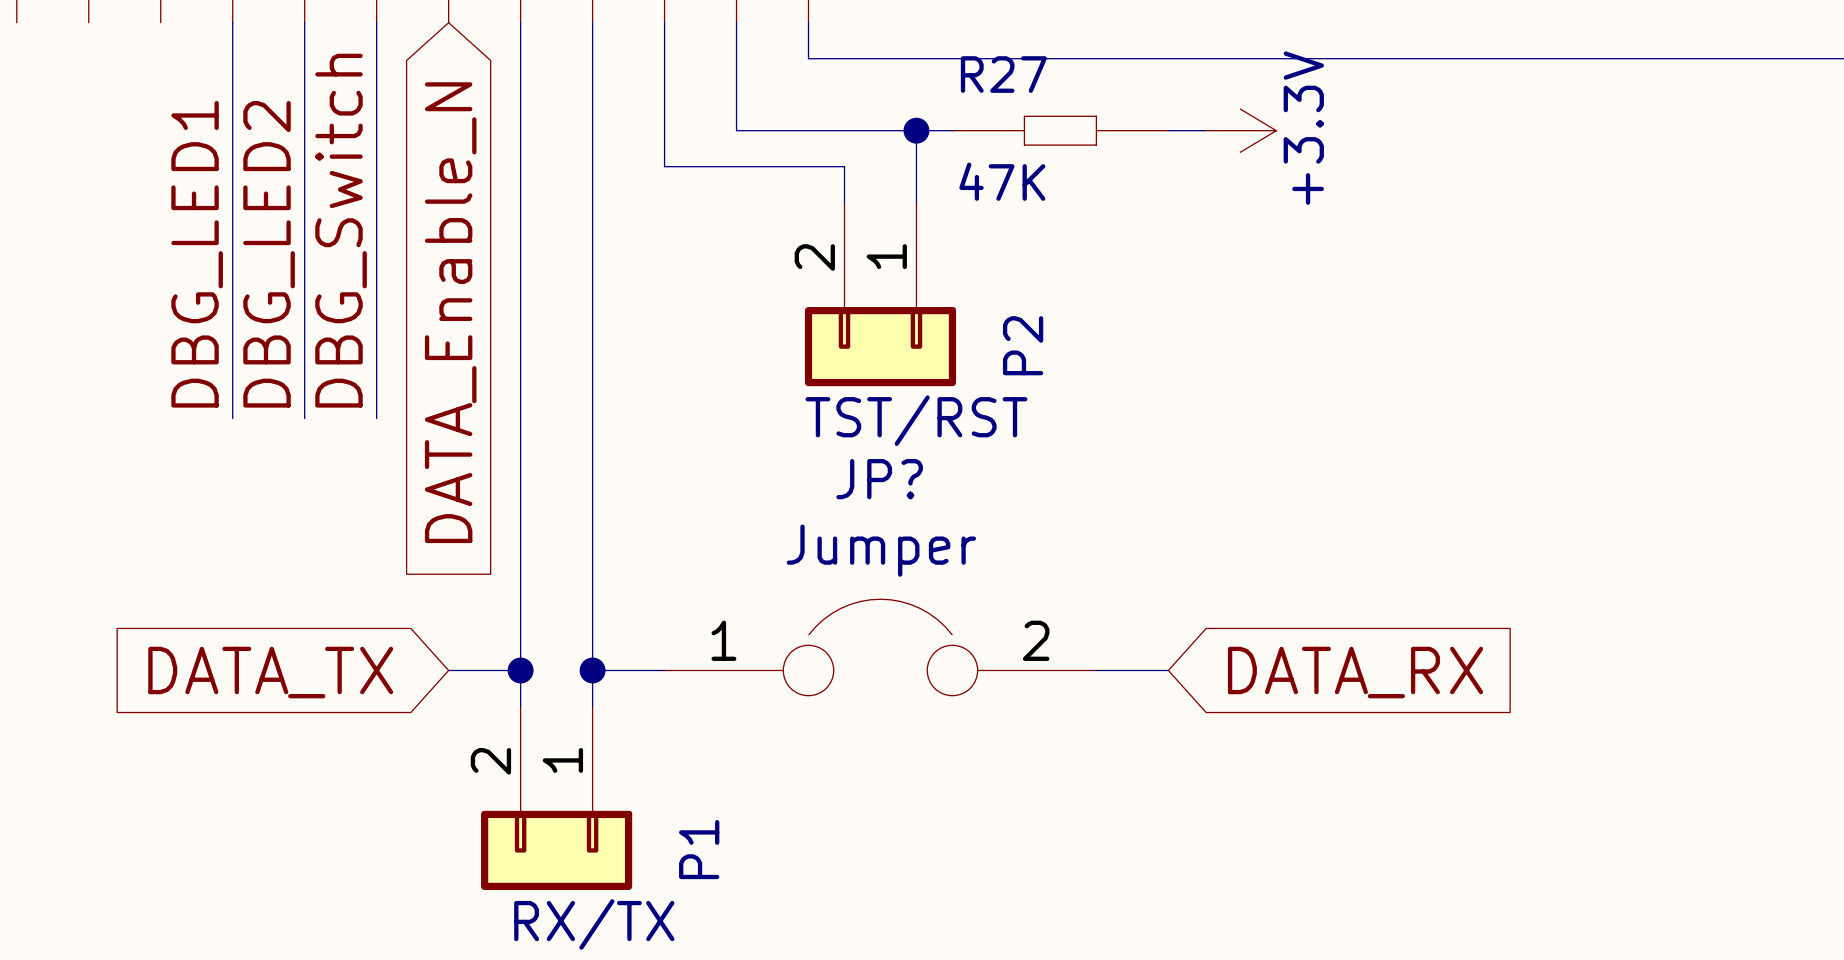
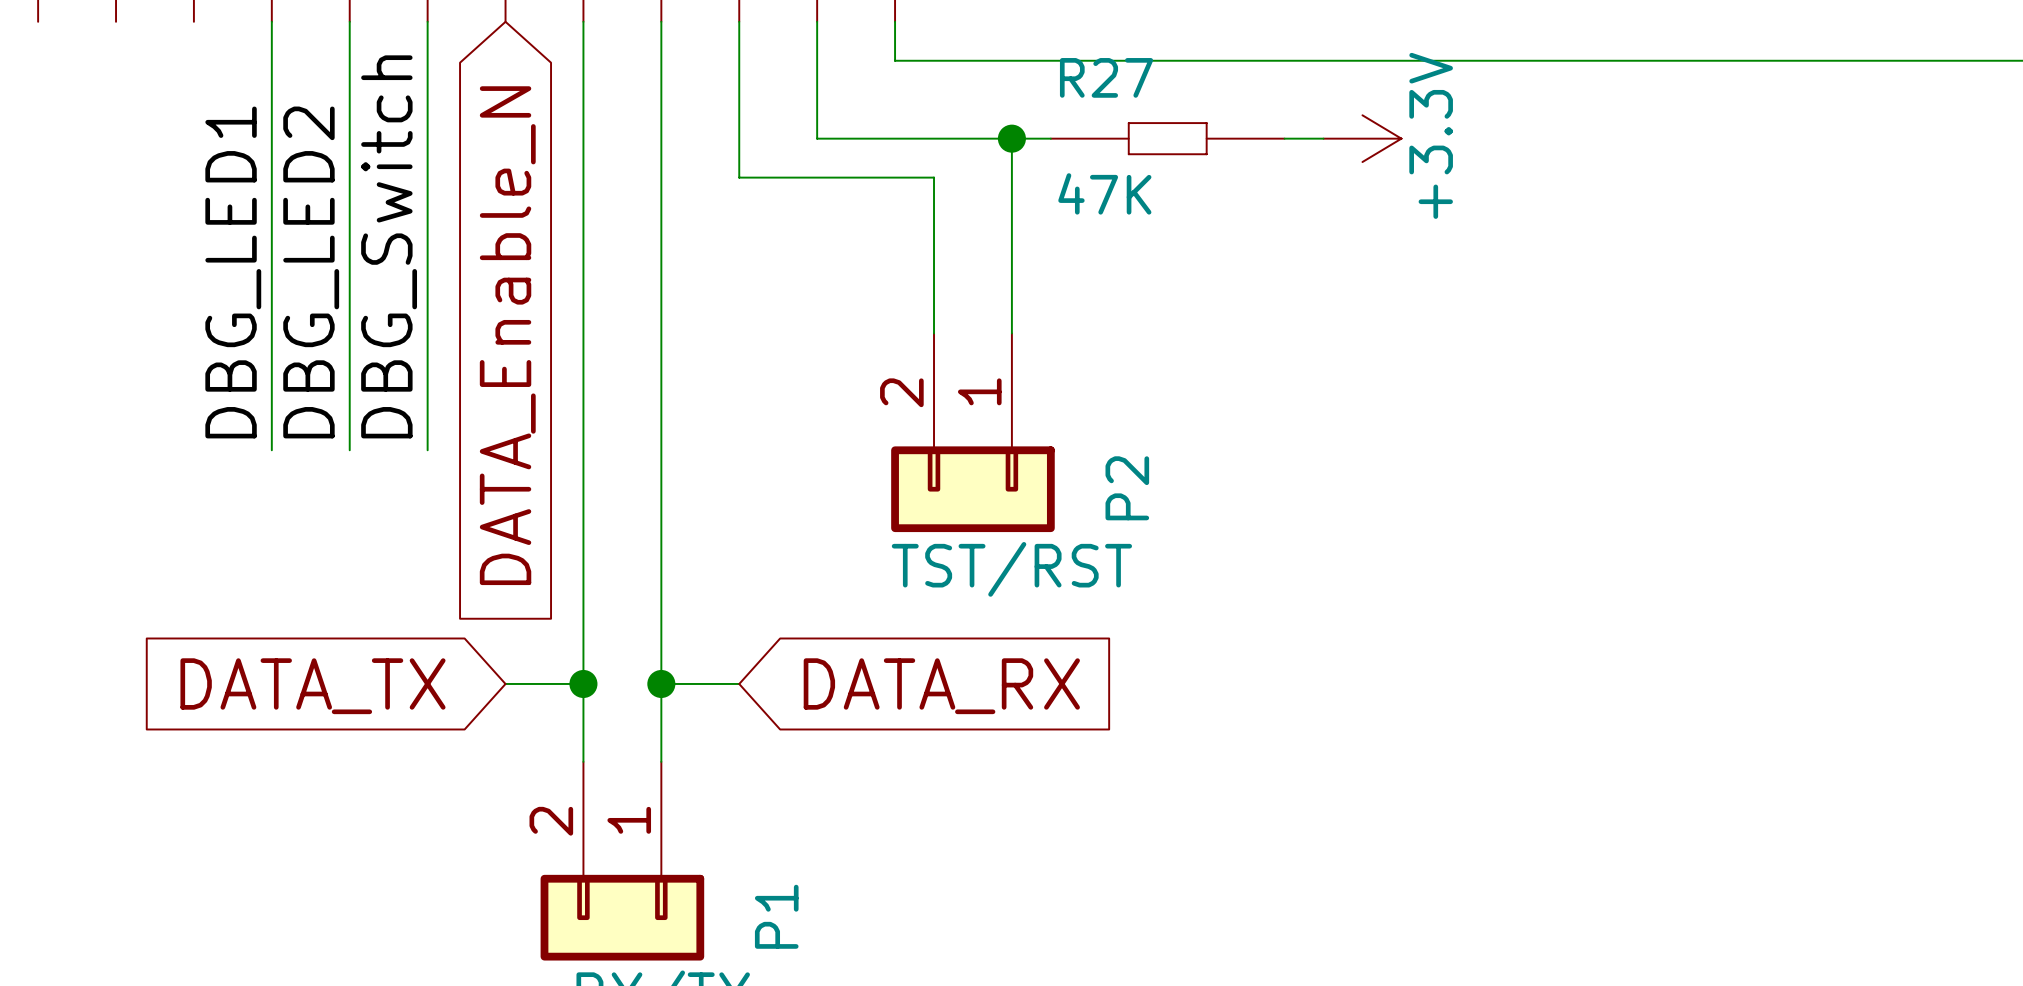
P2 position: (880, 294) -> (972, 432)
JP?: Jumper (880, 647) -> none
wire: (448, 670) (520, 670) -> (505, 683) (583, 683)
junction position: (520, 670) -> (583, 683)
wire: (592, 670) (664, 670) -> (661, 683) (739, 683)
junction position: (592, 670) -> (661, 683)
wire: (1096, 670) (1168, 670) -> none
global label position: DATA_TX (270, 672) -> DATA_TX (312, 686)
global label position: DATA_RX (1355, 672) -> DATA_RX (941, 686)

